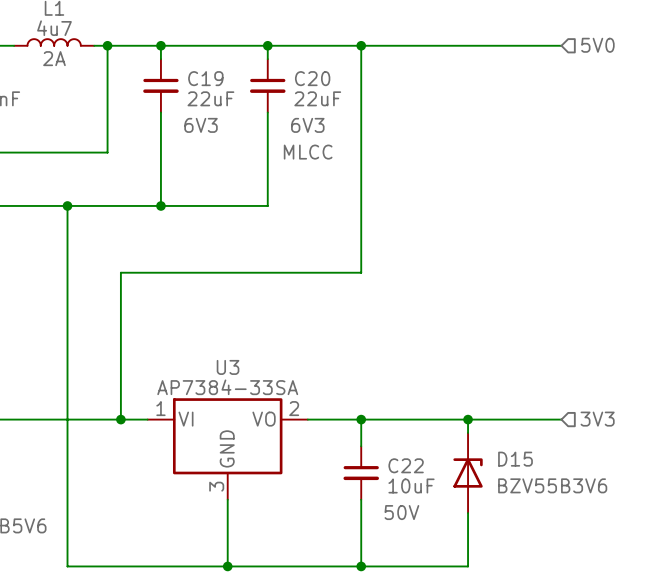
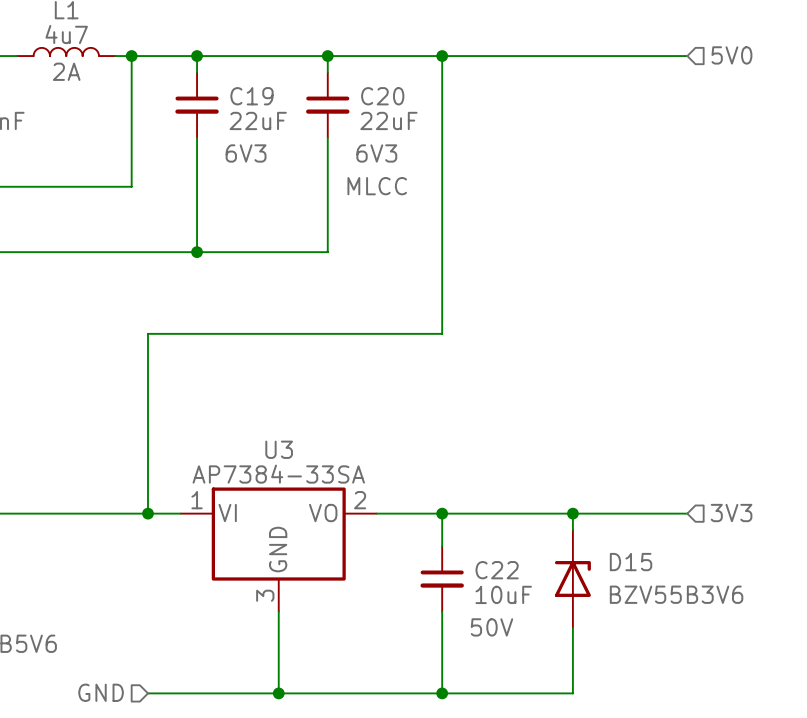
wire: (67, 205) (67, 566) (120, 566) -> none
junction: (67, 205) -> none
hierarchical label: none -> GND (101, 692)

